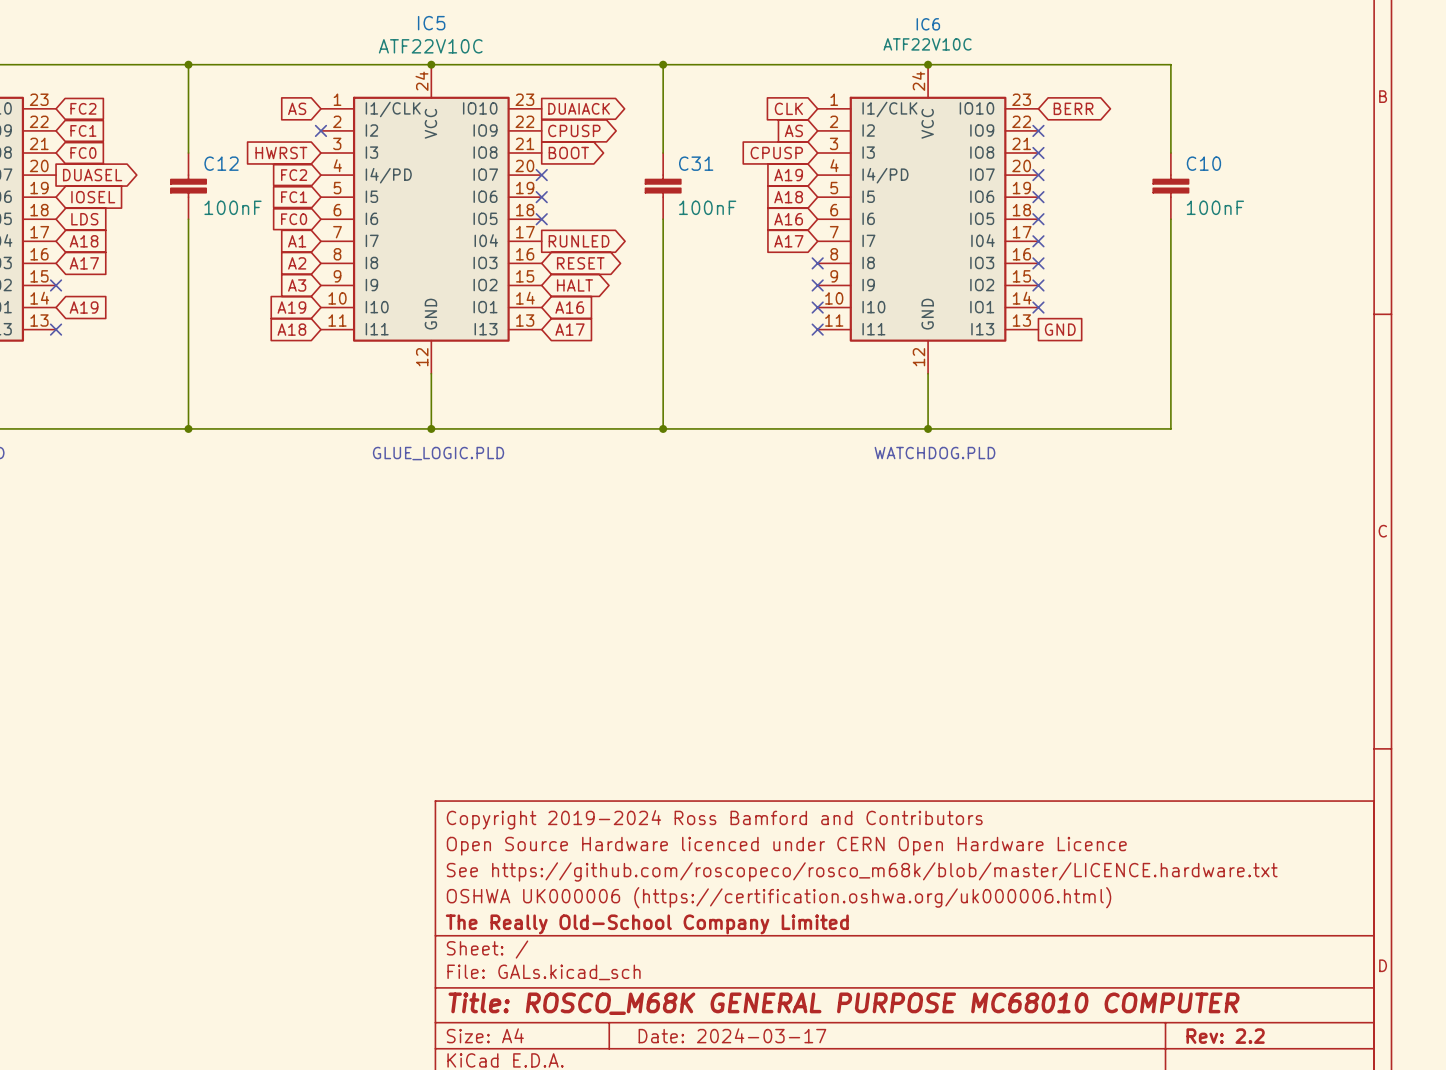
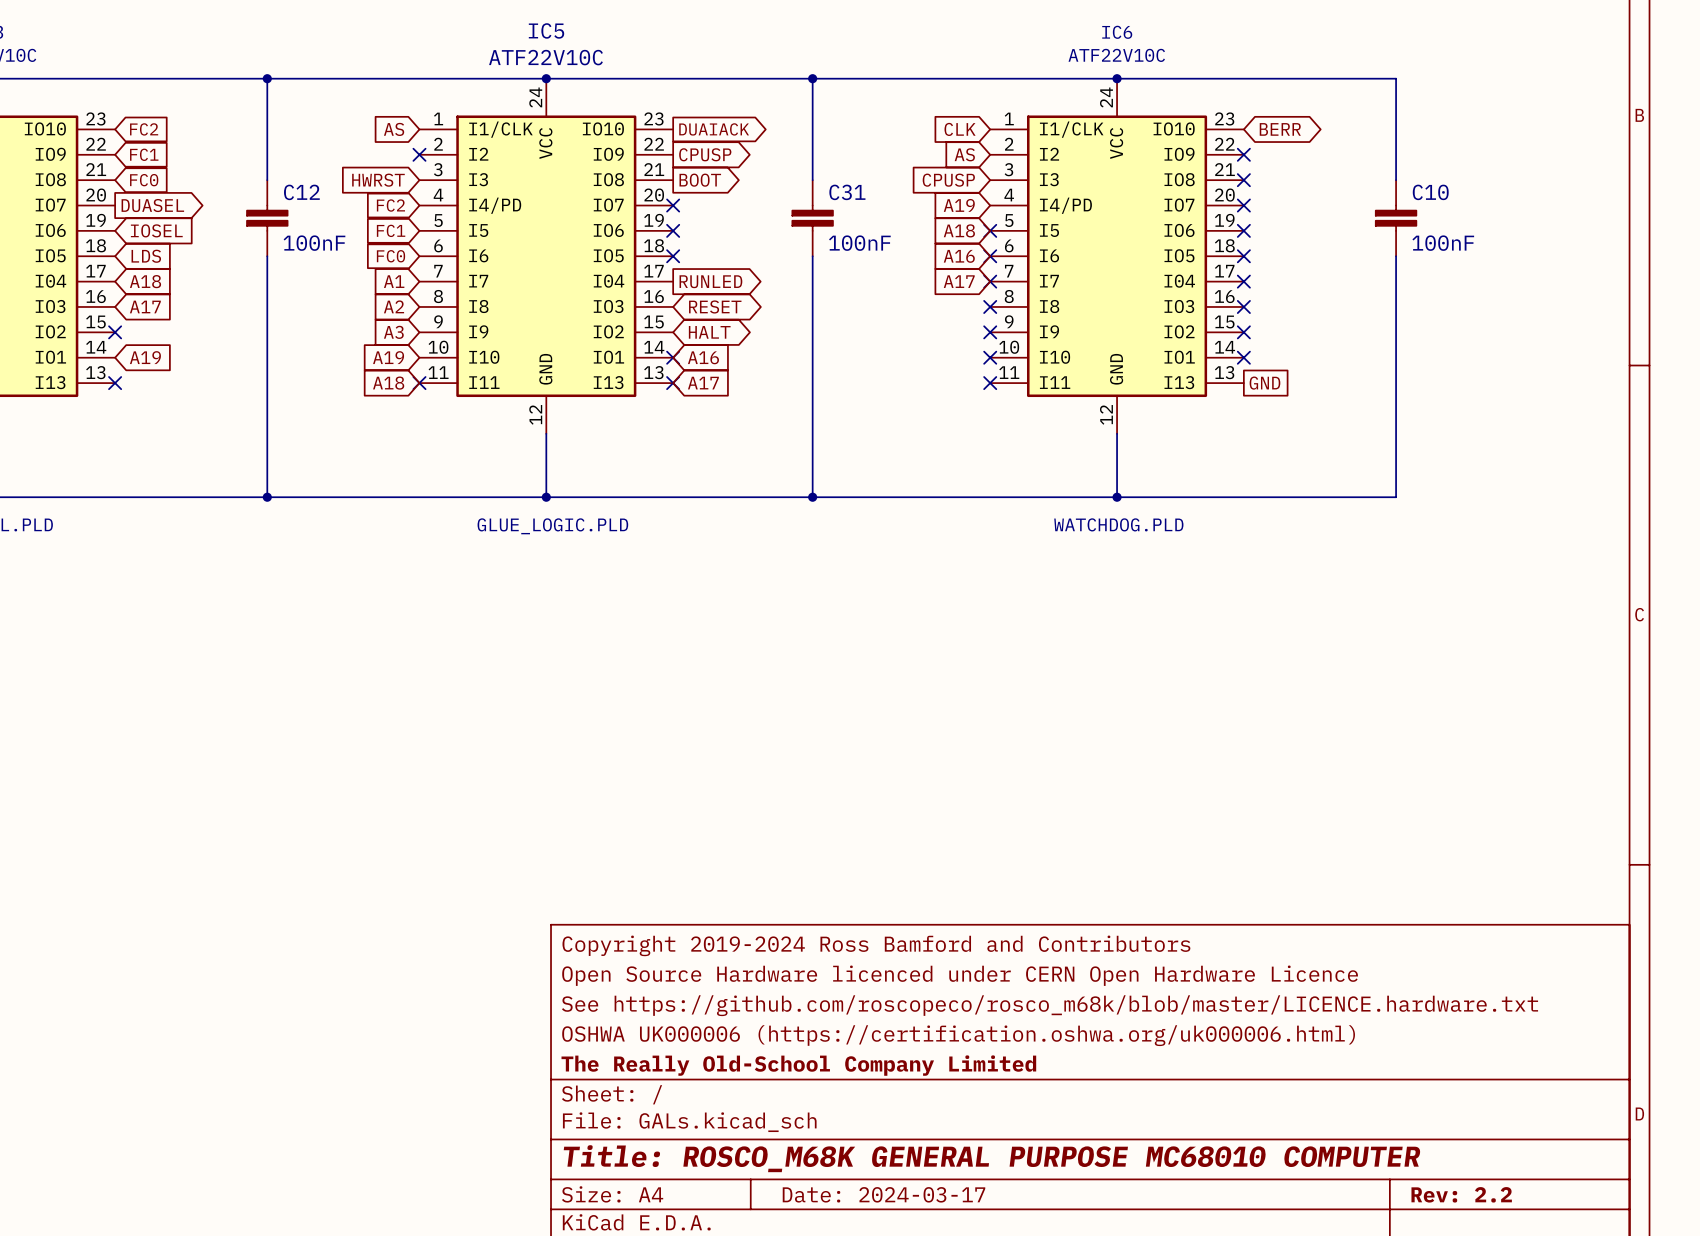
no-connect mark: none -> (990, 230)
no-connect mark: none -> (990, 256)
no-connect mark: none -> (990, 281)
no-connect mark: none -> (673, 357)
no-connect mark: none -> (419, 383)
no-connect mark: none -> (673, 383)

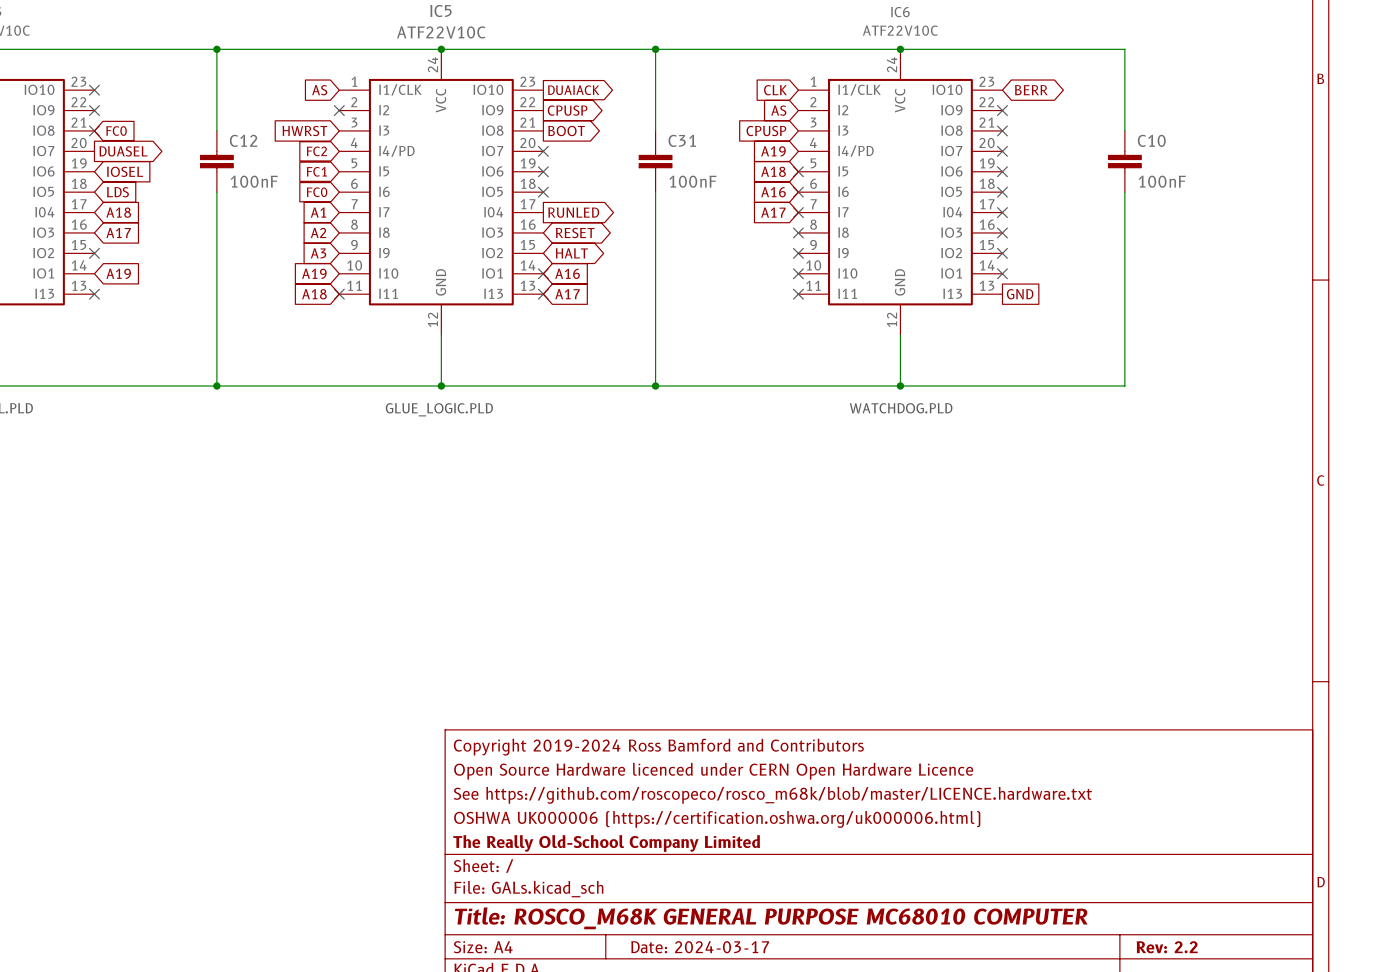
no-connect mark: none -> (94, 90)
global label: FC2 (144, 129) -> none
no-connect mark: none -> (94, 110)
global label: FC1 (144, 154) -> none
no-connect mark: none -> (94, 130)

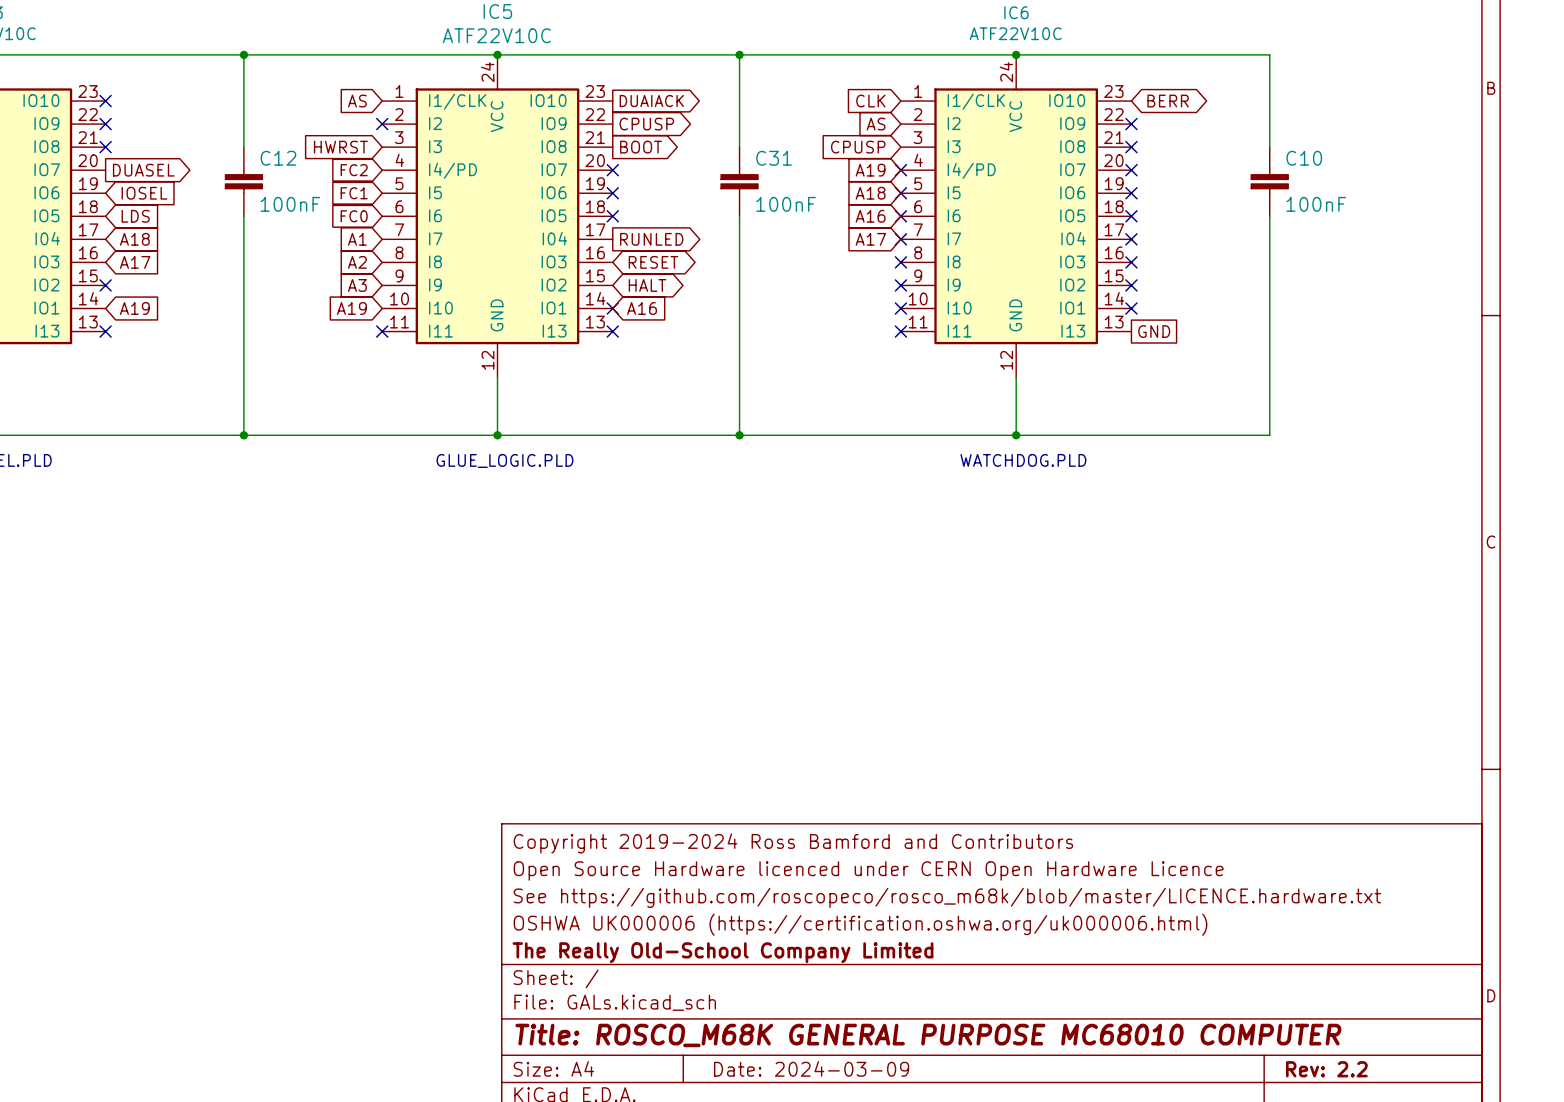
global label: FC0 (116, 131) -> none
no-connect mark: none -> (900, 170)
global label: A18 (314, 294) -> none
global label: A17 (567, 294) -> none
title block: Date: 2024-03-17 (700, 947) -> Date: 2024-03-09 (811, 1068)

